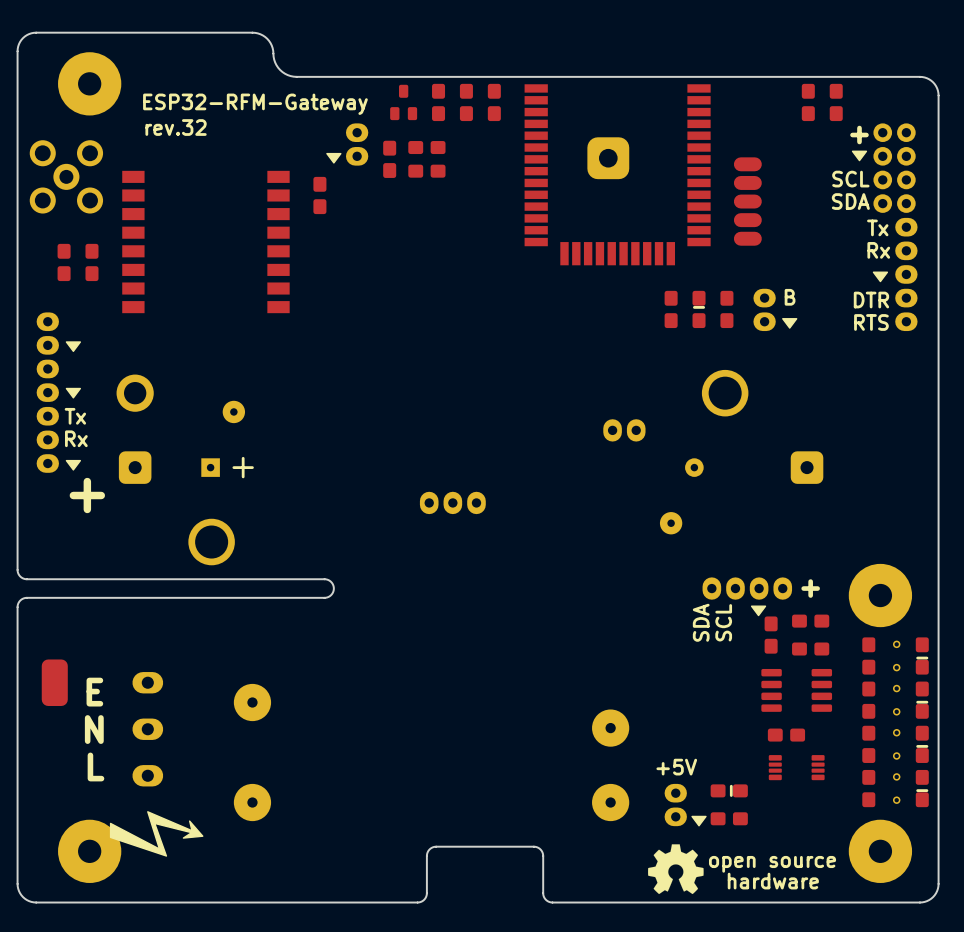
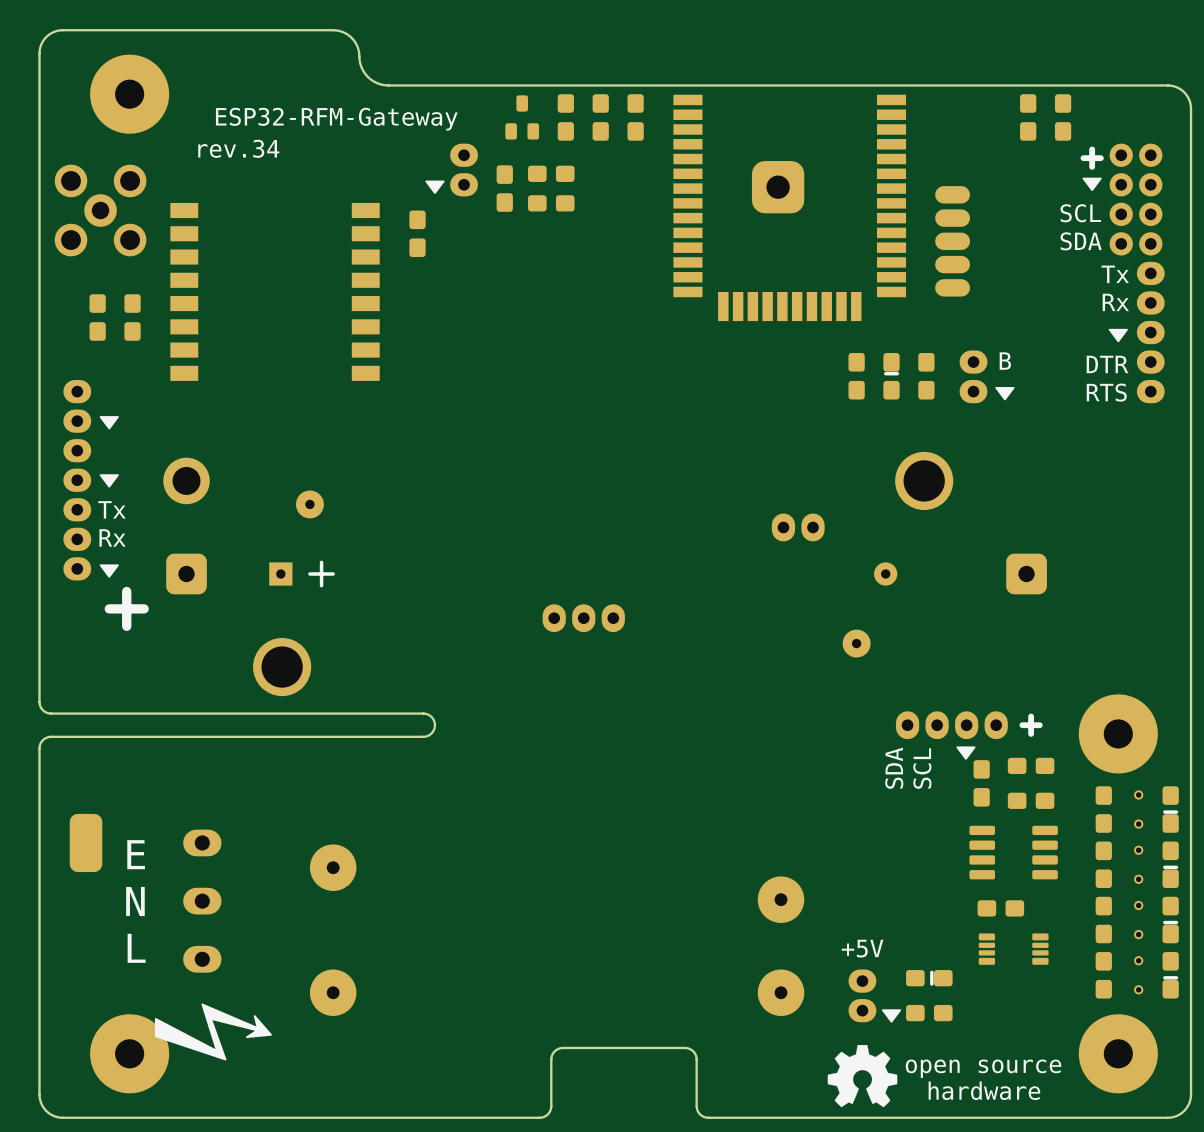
text: rev.32 (176, 127) -> rev.34 (238, 148)

